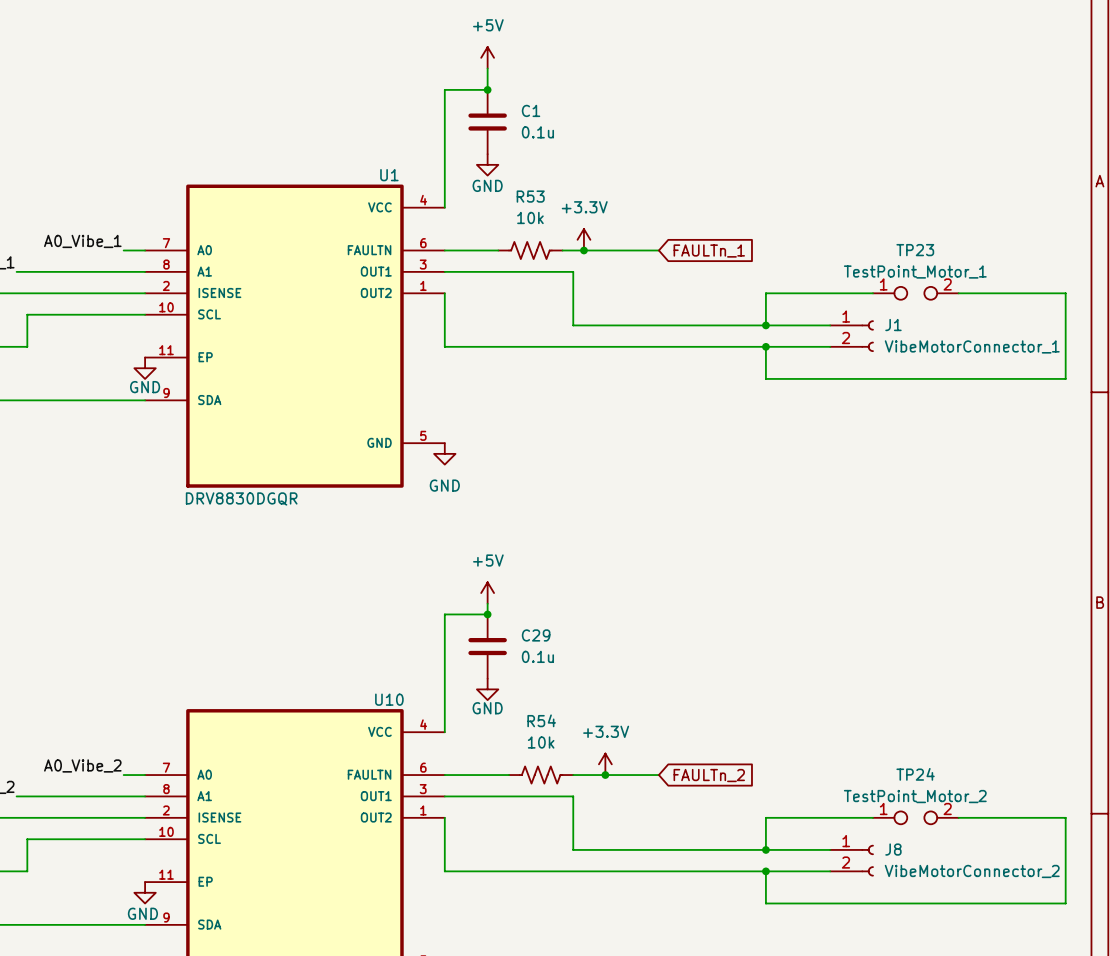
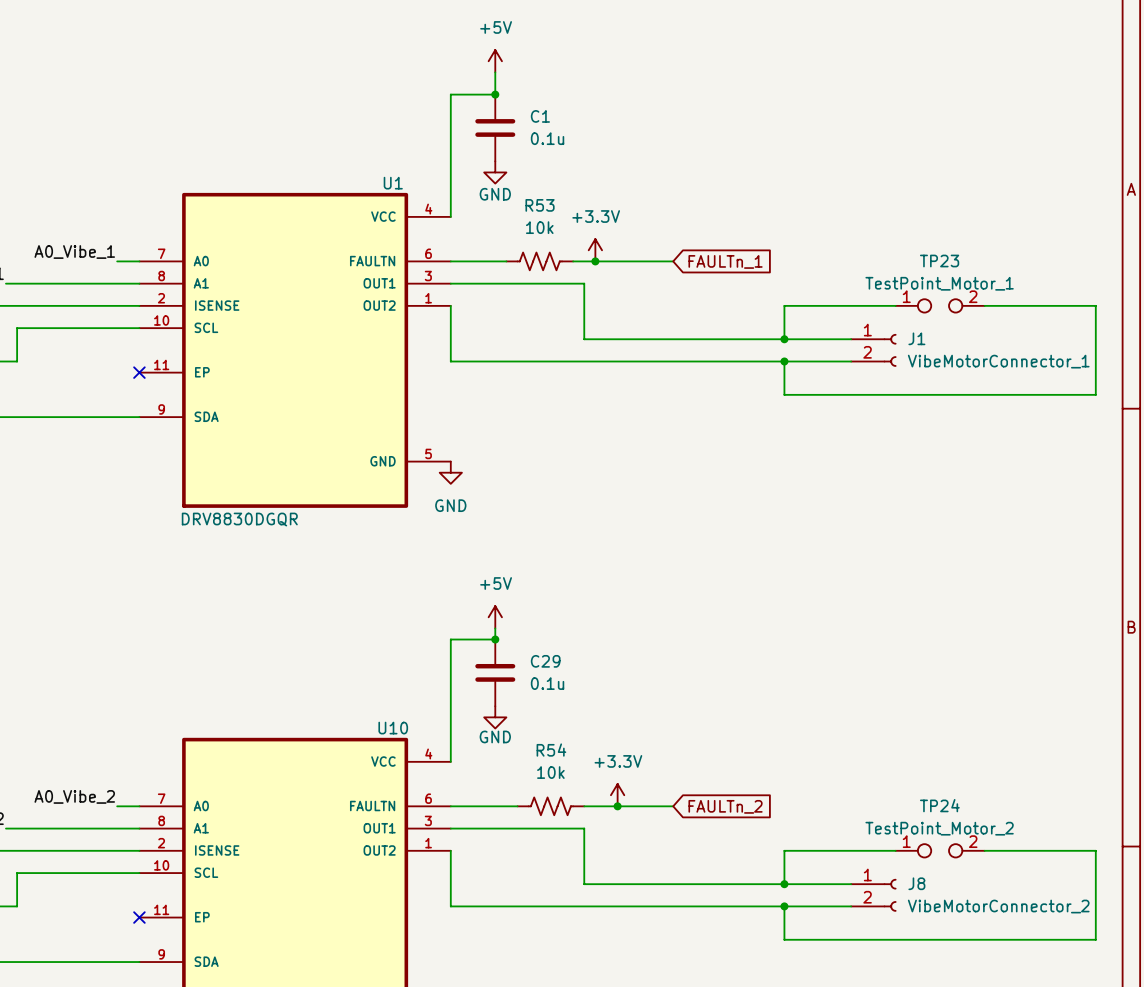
no-connect mark: none -> (139, 372)
power symbol: GND (145, 368) -> none
no-connect mark: none -> (139, 917)
power symbol: GND (145, 892) -> none

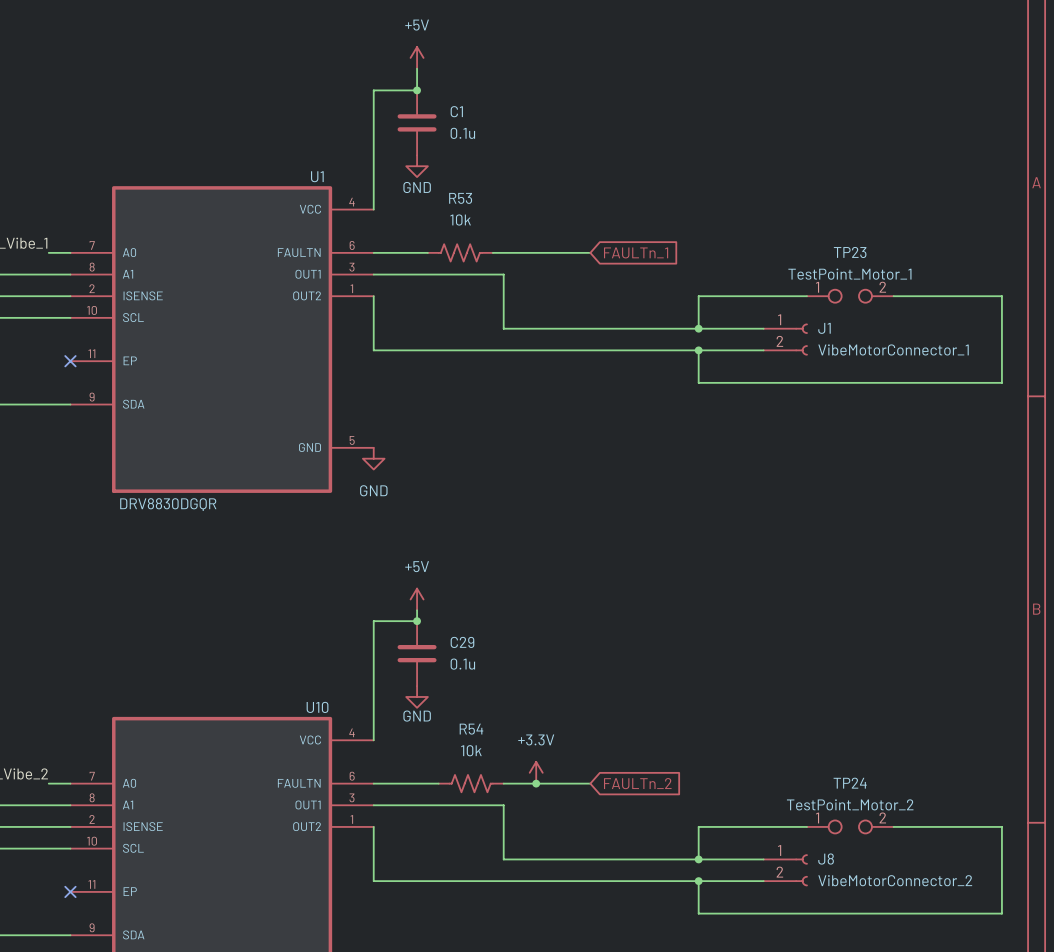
power symbol: +3.3V (595, 250) -> none
junction: (595, 261) -> none

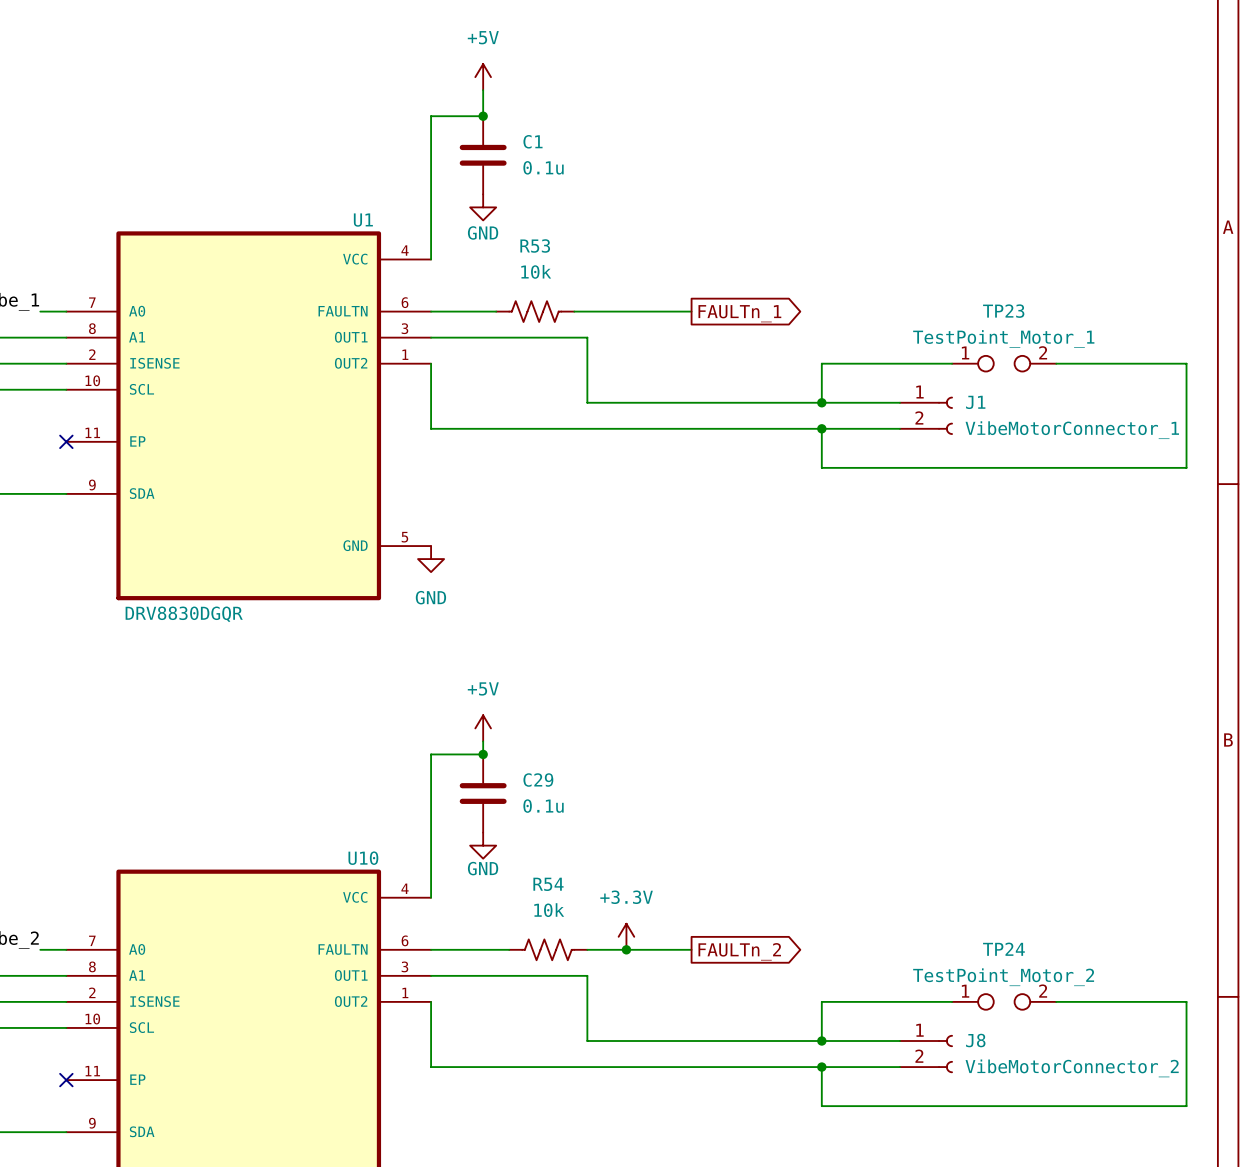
global label shape: input (636, 252) -> output (739, 313)
global label shape: input (637, 783) -> output (739, 951)

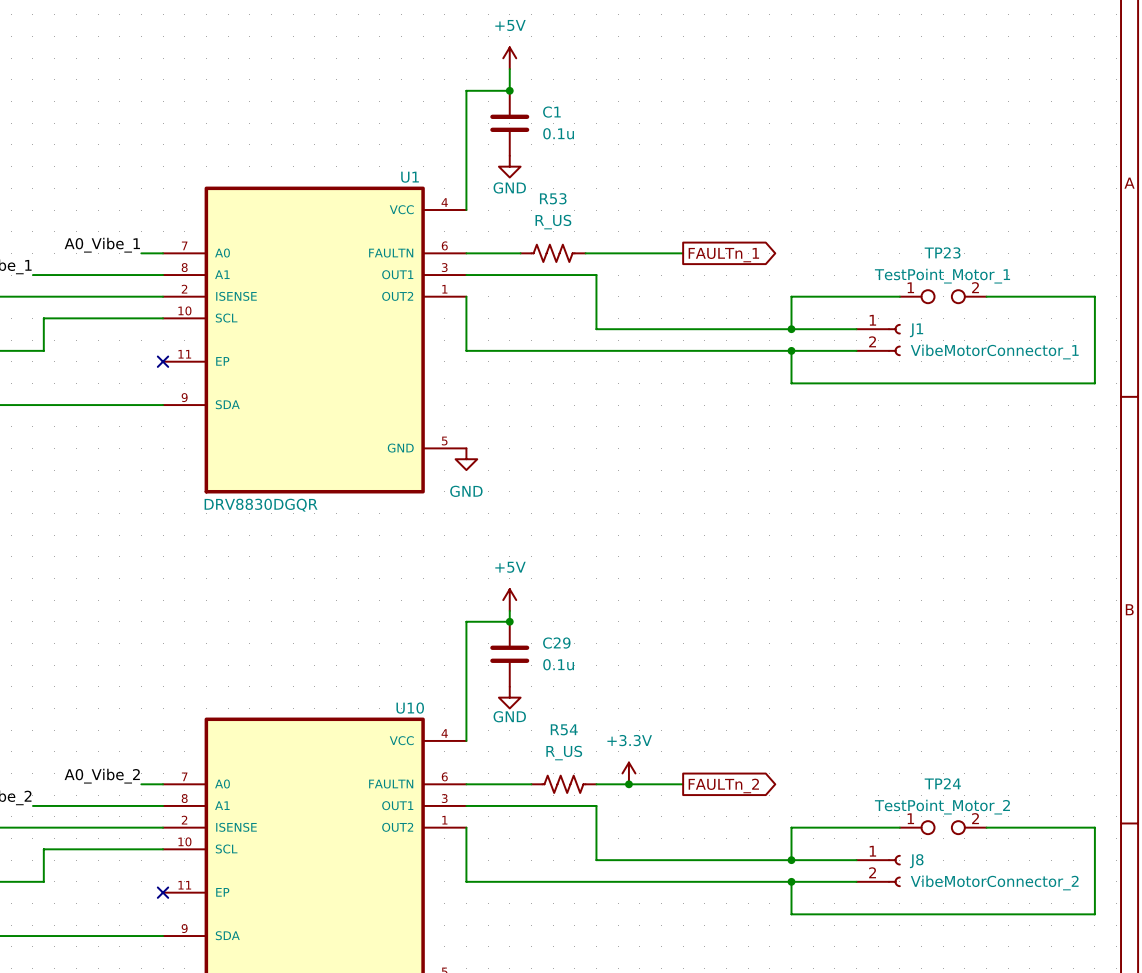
R53 value: 10k (536, 271) -> R_US (553, 222)
R54 value: 10k (549, 910) -> R_US (564, 753)

